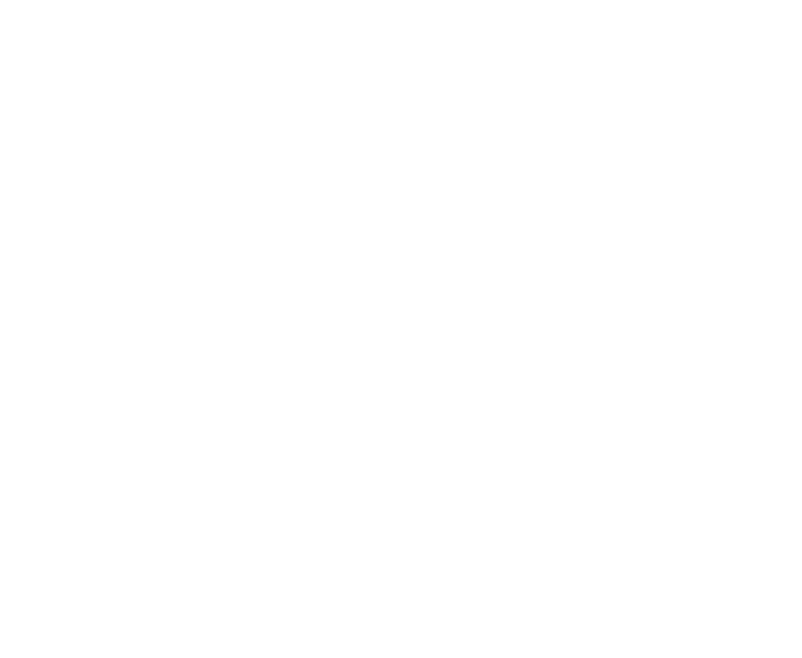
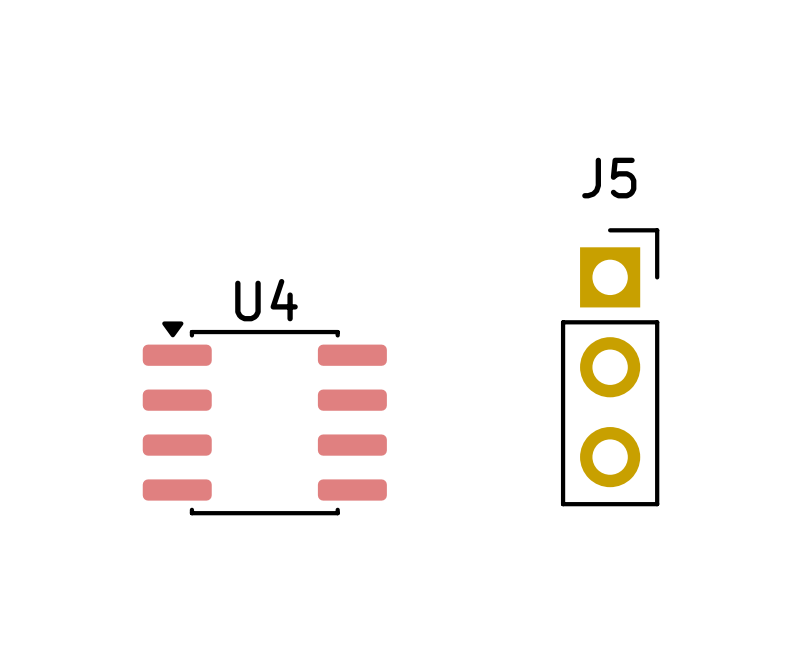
J5: none -> (610, 367)
U4: none -> (264, 418)

